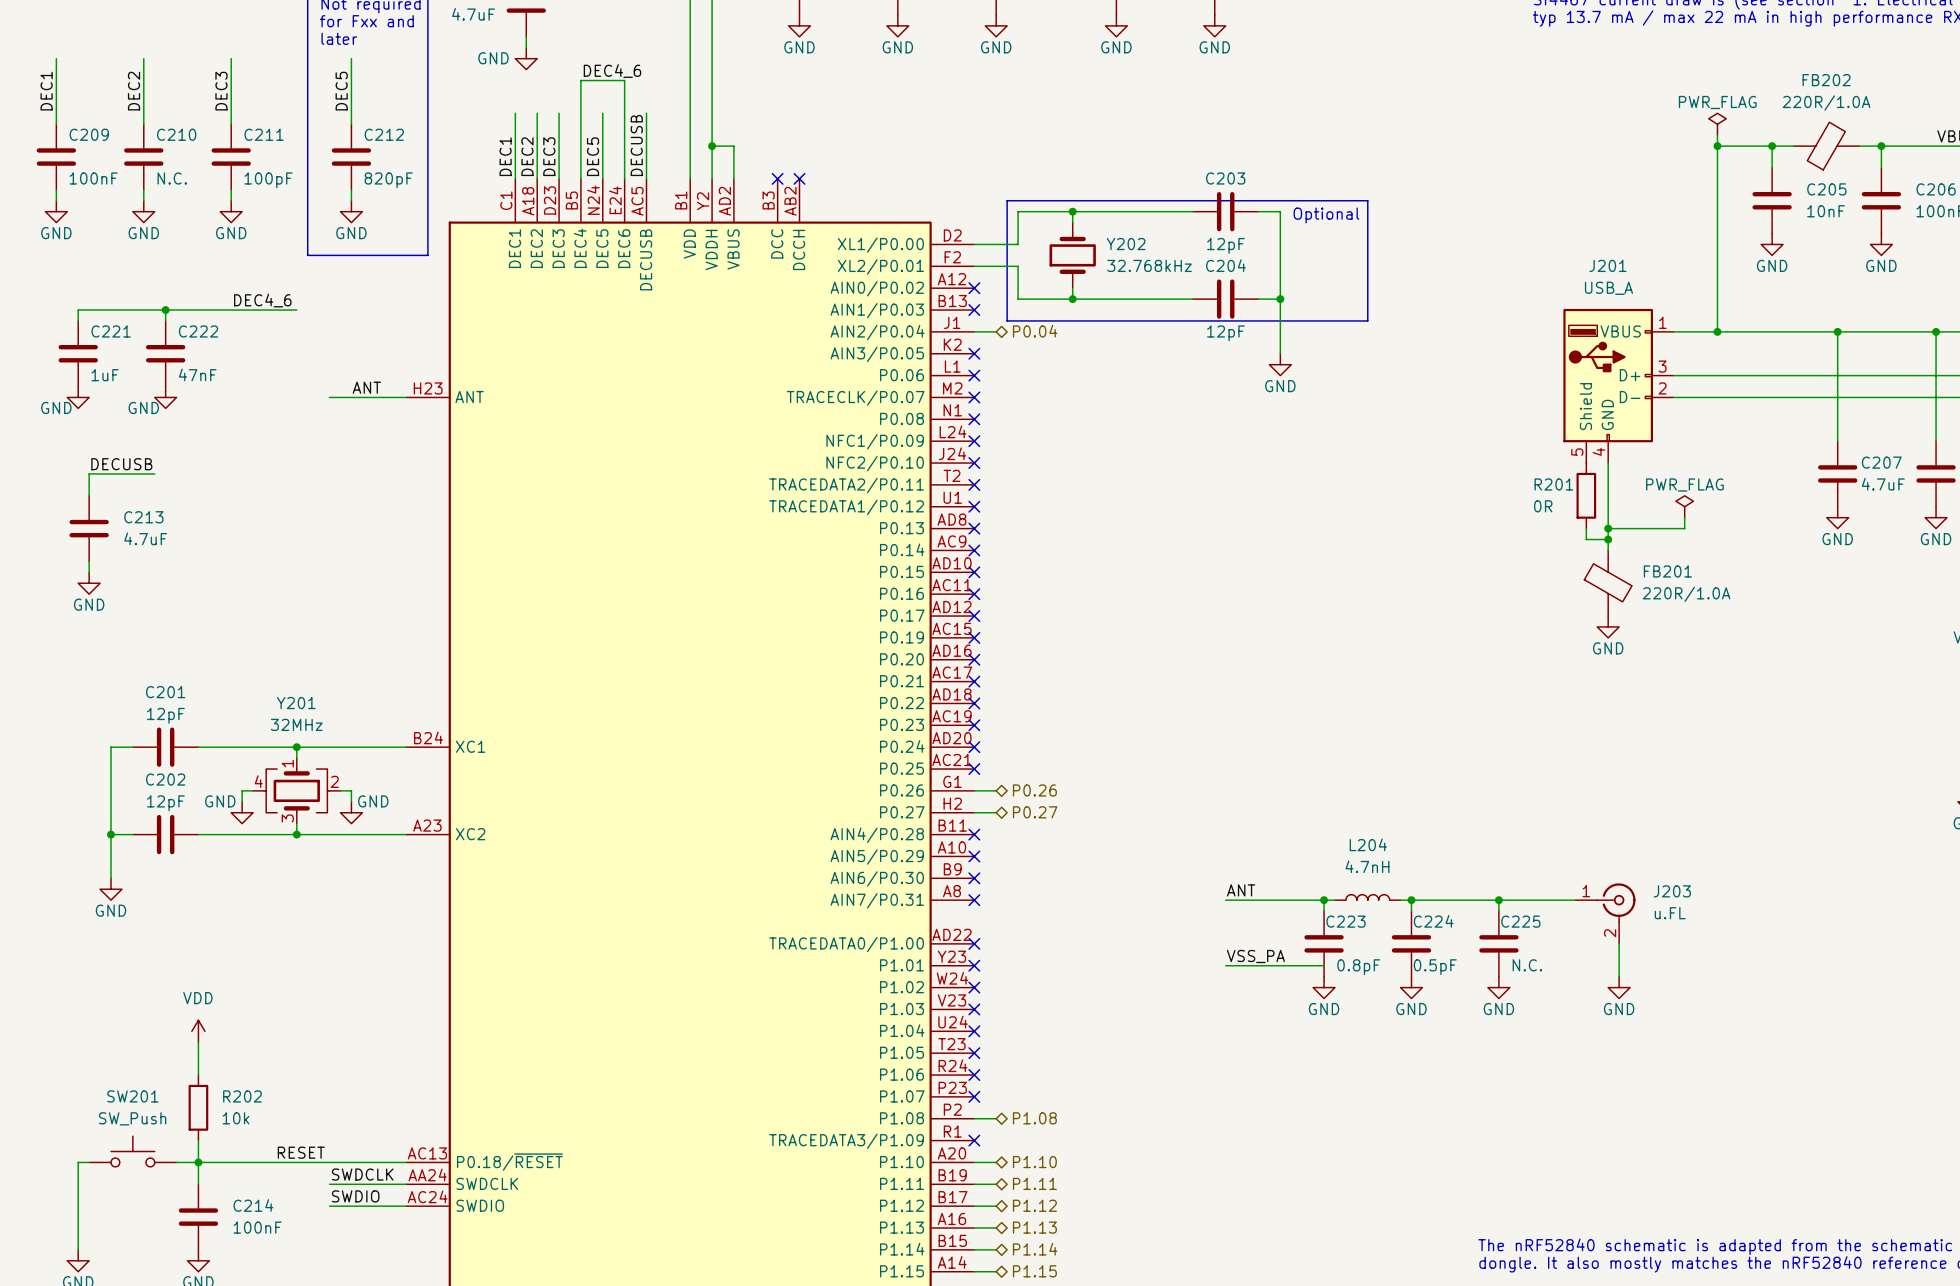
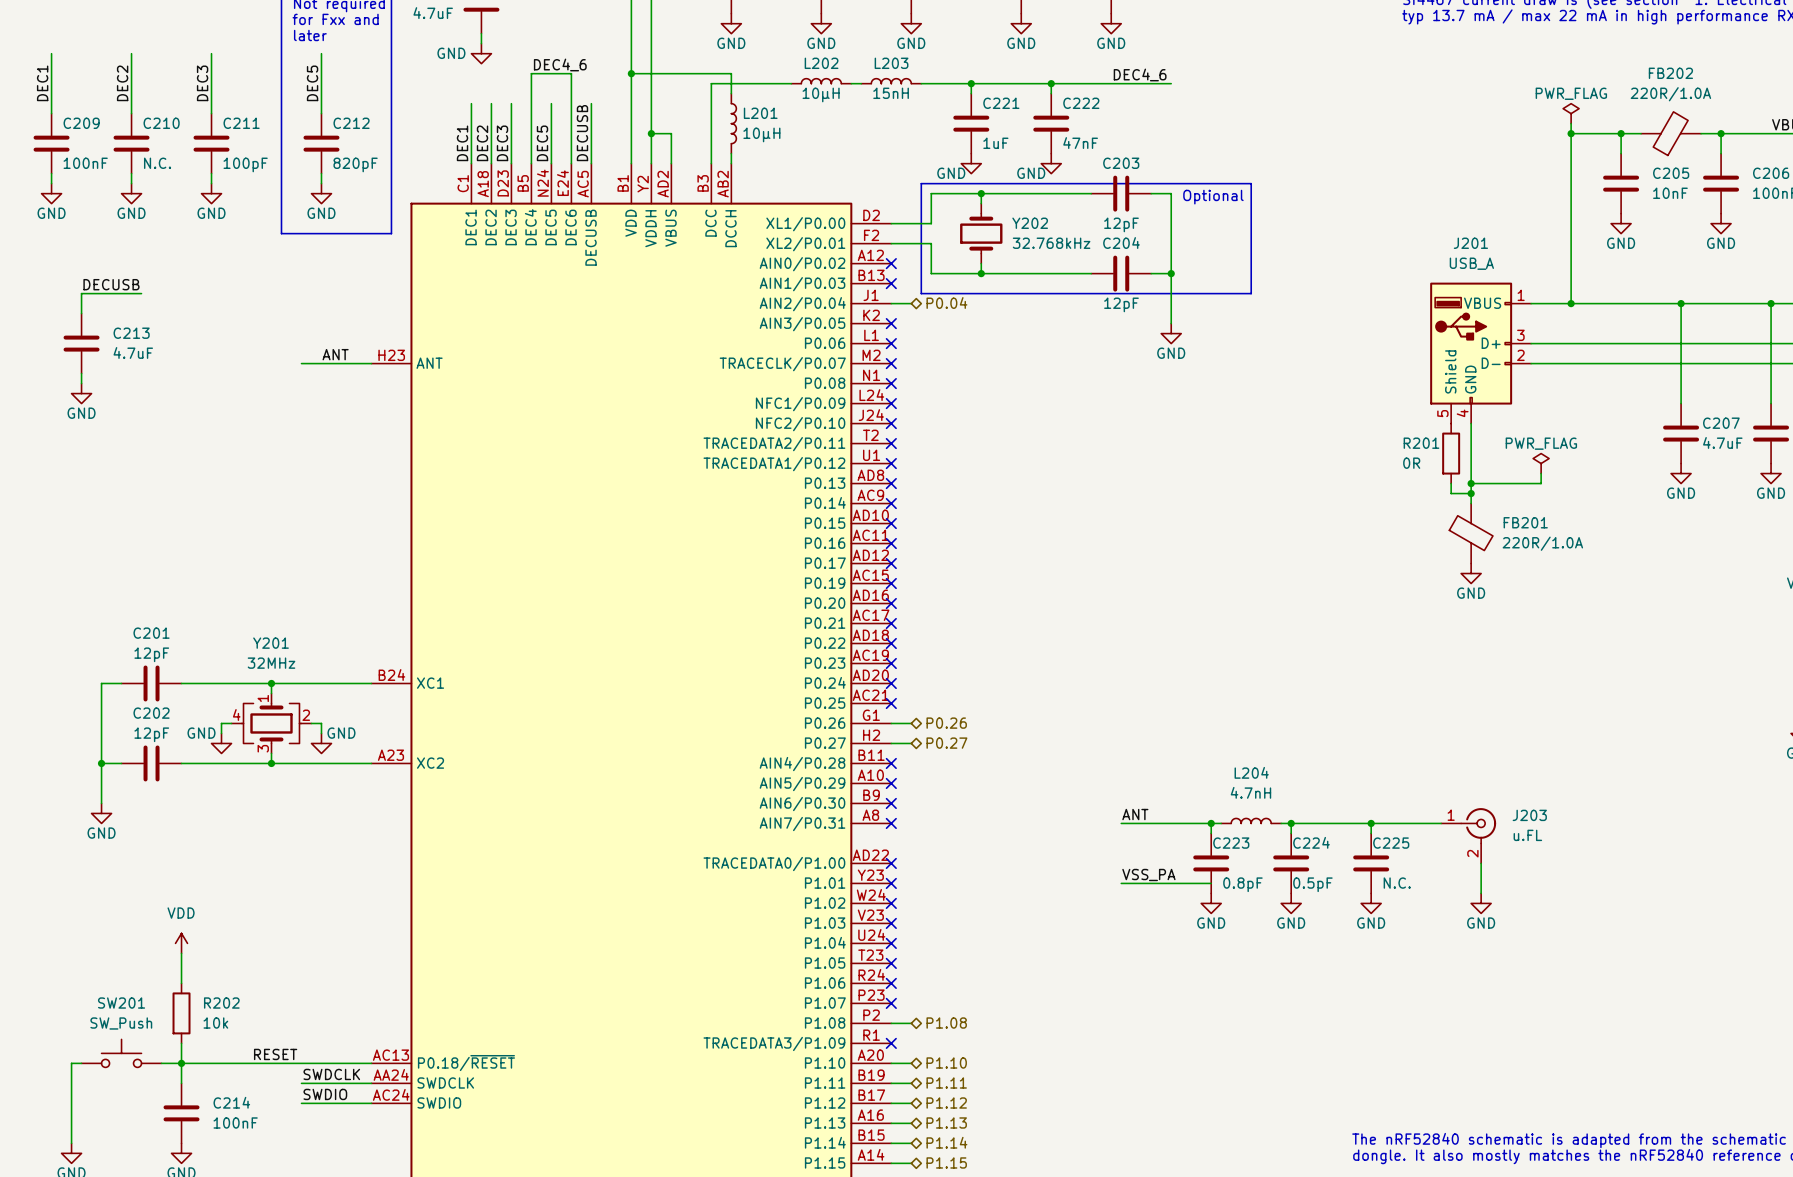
wire: none -> (631, 73) (731, 73) (731, 93)
junction: none -> (631, 73)
label: none -> DEC4_6 (1140, 74)
L202: none -> 10μH (821, 81)
L203: none -> 15nH (891, 81)
wire: none -> (791, 83) (711, 83) (711, 163)
wire: none -> (851, 83) (861, 83)
wire: none -> (921, 83) (1171, 83)
wire: none -> (971, 83) (971, 93)
junction: none -> (971, 83)
wire: none -> (1051, 83) (1051, 93)
junction: none -> (1051, 83)
L201: none -> 10μH (733, 123)
wire: none -> (731, 153) (731, 163)
no-connect mark: (777, 178) -> none
no-connect mark: (799, 178) -> none
power symbol: none -> GND (971, 163)
power symbol: none -> GND (1051, 163)
label: DEC4_6 (262, 300) -> none
wire: (165, 310) (165, 320) -> none
junction: (165, 310) -> none
wire: (296, 310) (78, 310) (78, 320) -> none
C221 position: (78, 353) -> (971, 123)
C222 position: (165, 353) -> (1051, 123)
power symbol position: GND (78, 397) -> GND (81, 393)
power symbol: GND (165, 397) -> none
power symbol text position: GND (56, 407) -> GND (81, 413)
label position: DECUSB (121, 464) -> DECUSB (111, 284)
wire: (154, 473) (89, 473) (89, 495) -> (141, 293) (81, 293) (81, 313)
C213 position: (89, 528) -> (81, 343)
wire: (89, 561) (89, 572) -> (81, 373) (81, 383)
power symbol: GND (89, 583) -> none

